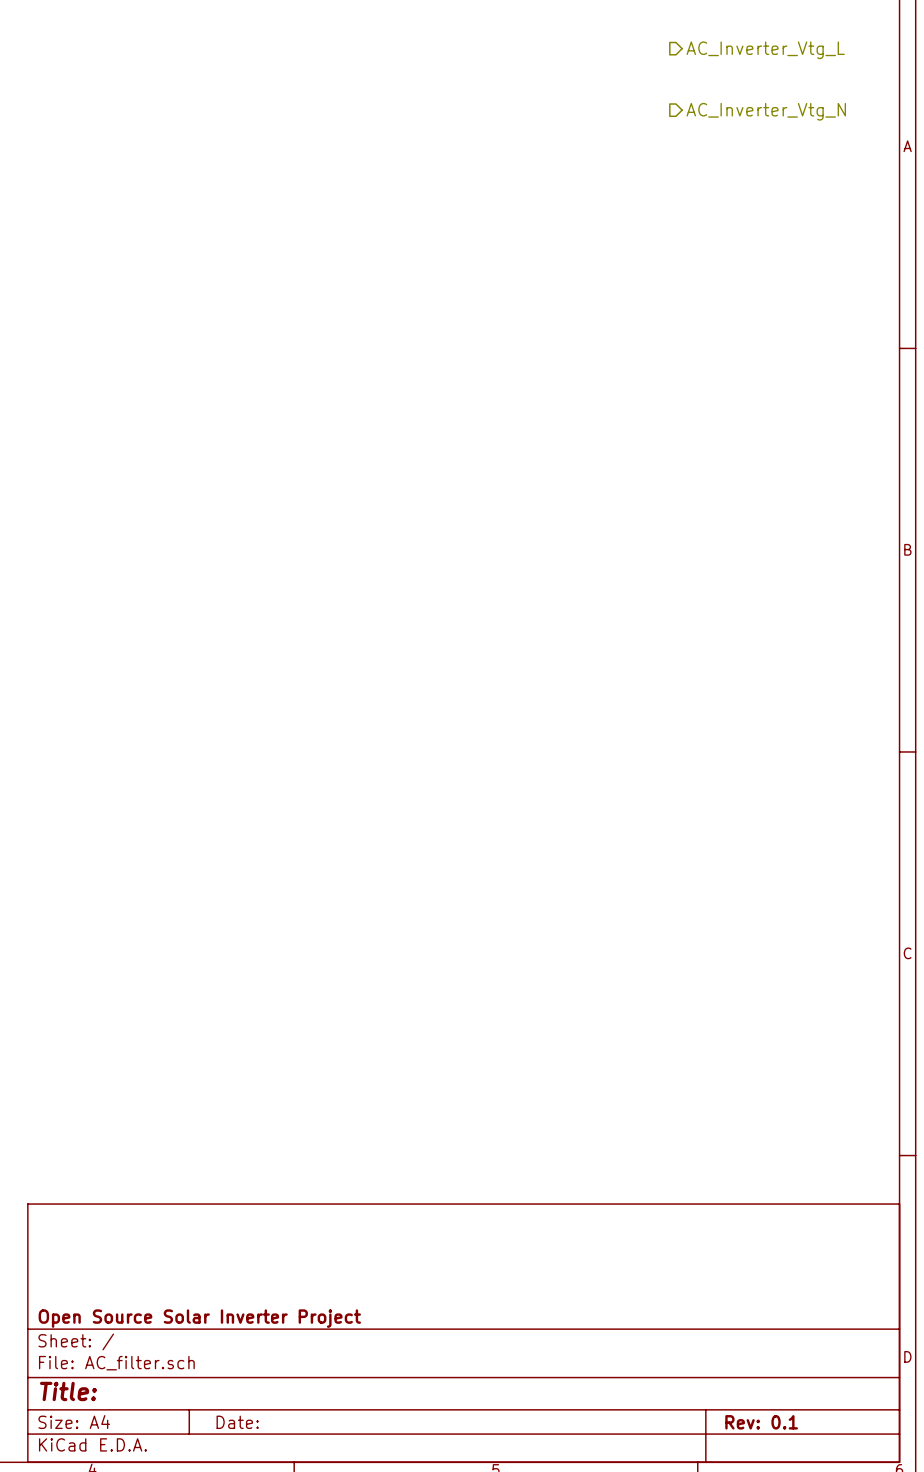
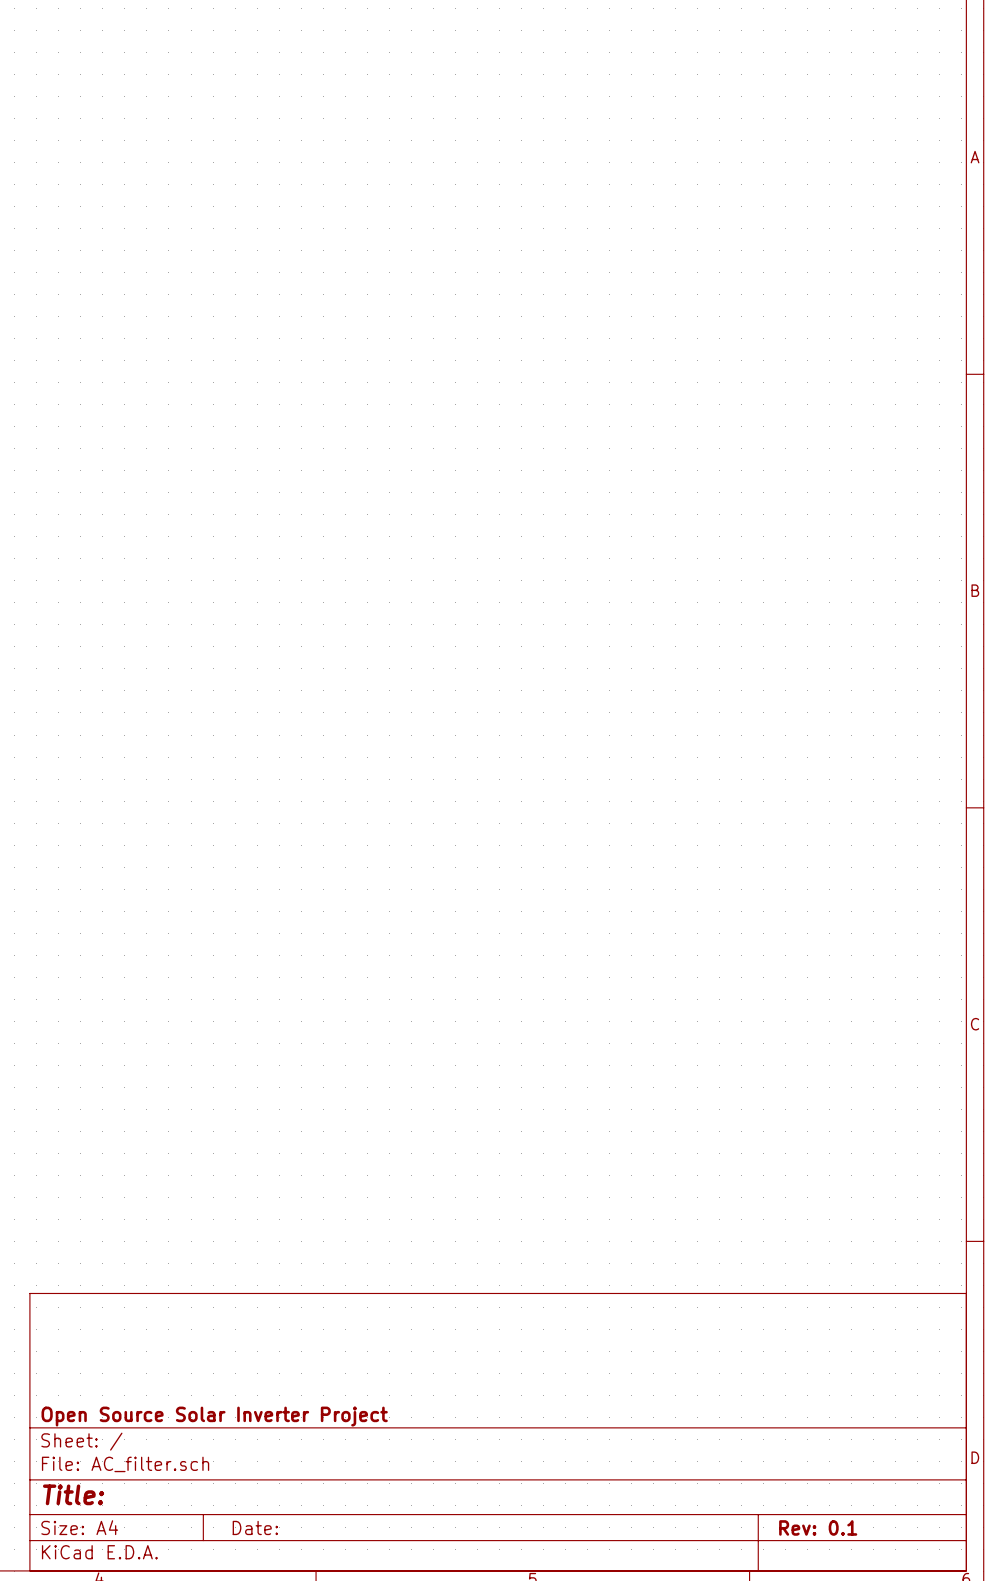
hierarchical label: AC_Inverter_Vtg_L (765, 50) -> none
hierarchical label: AC_Inverter_Vtg_N (766, 111) -> none

